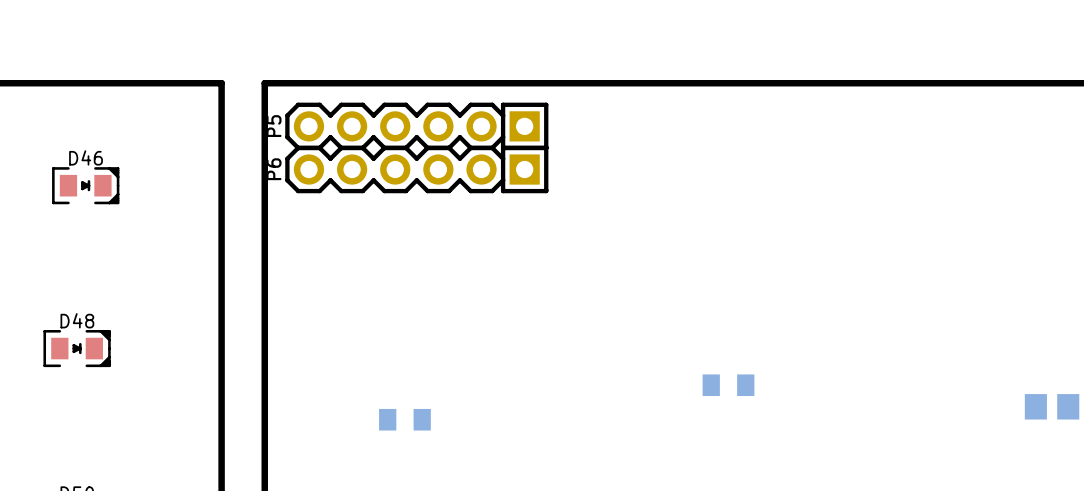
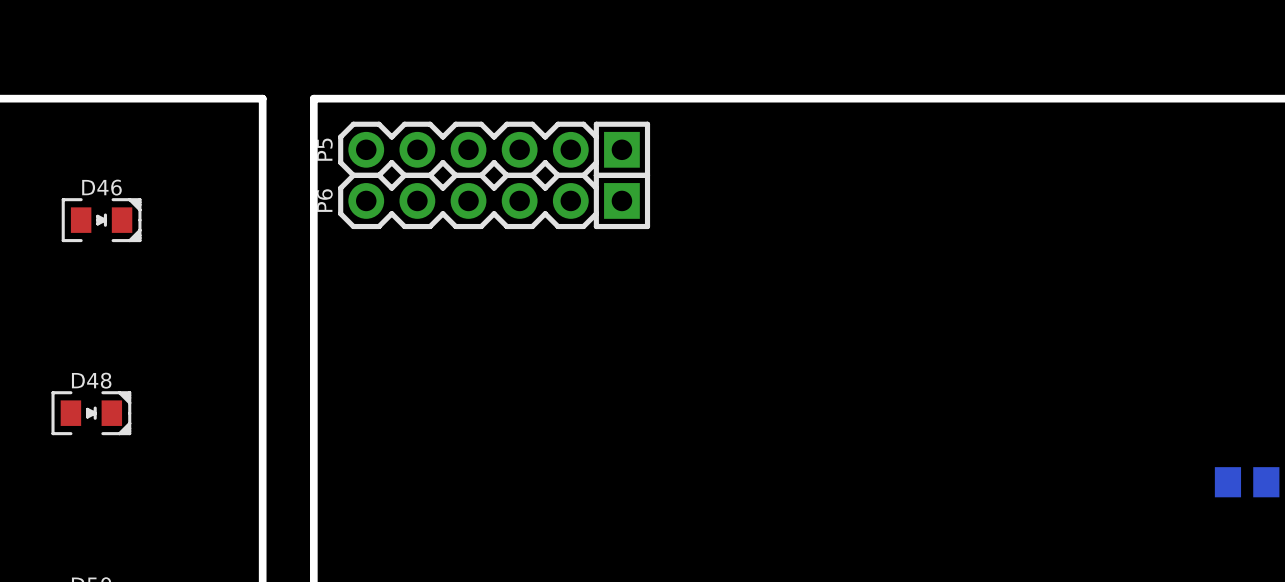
part: (728, 385) -> none
part: (404, 419) -> none

